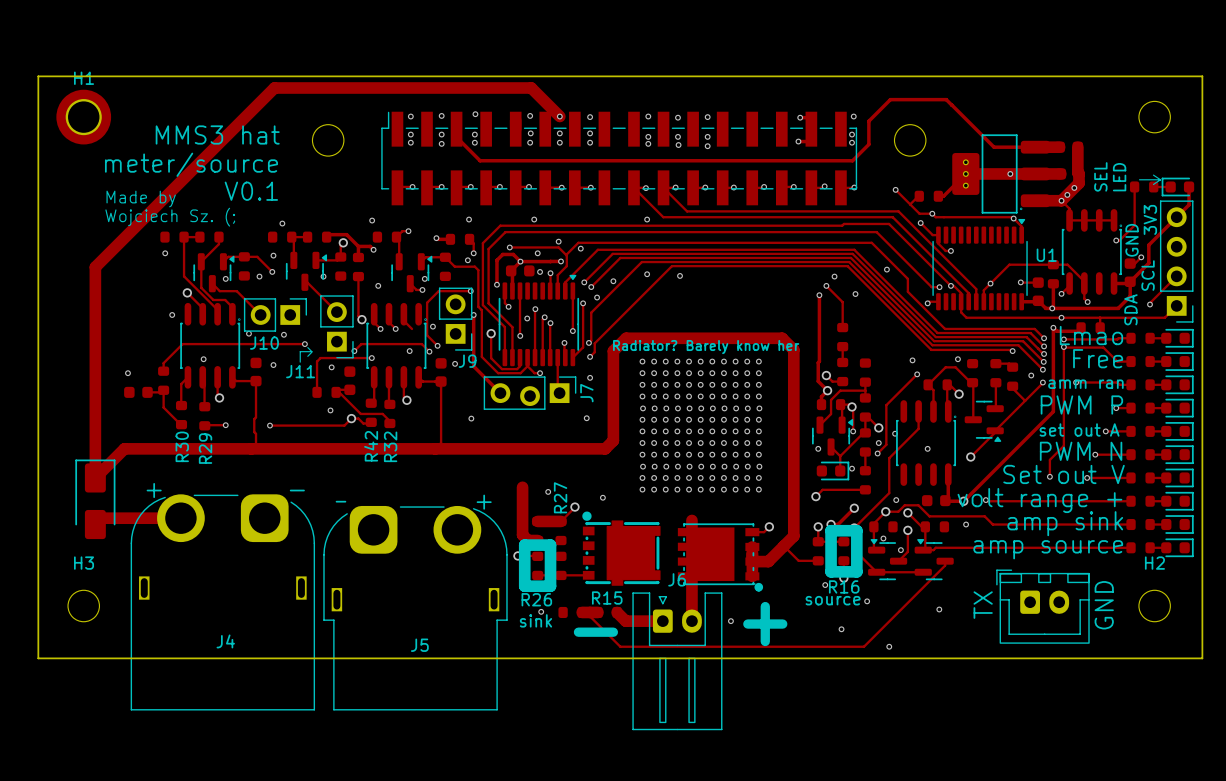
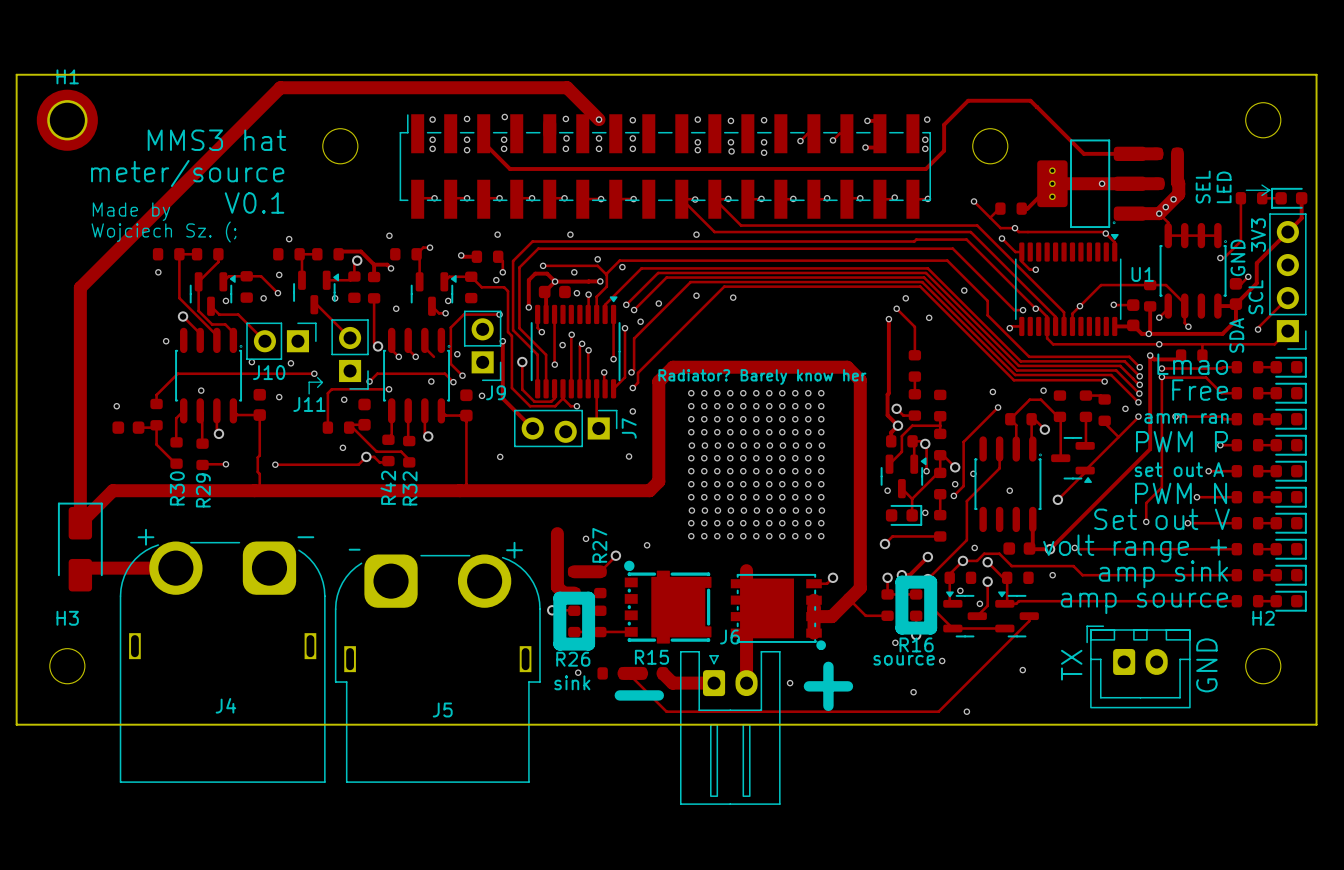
track: none -> (813, 133) (807, 133) (800, 141)
track: none -> (846, 133) (839, 133) (832, 140)
via: none -> (800, 141)
via: none -> (832, 140)

